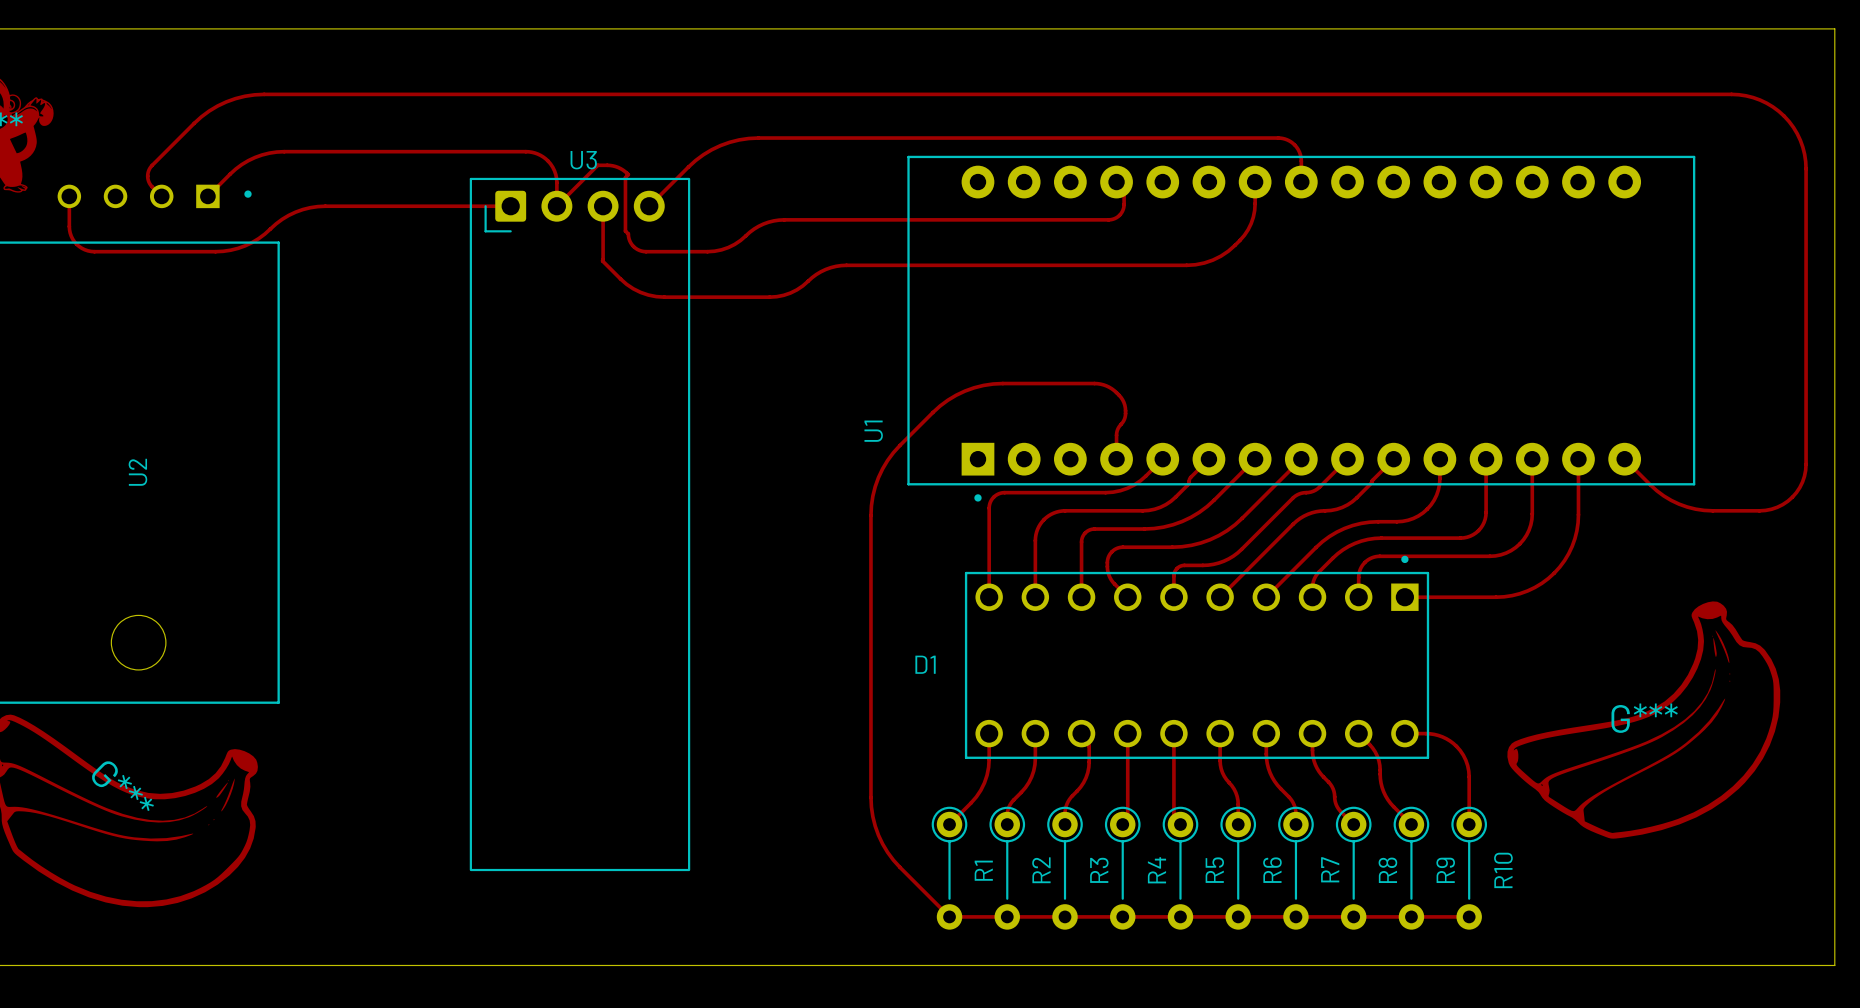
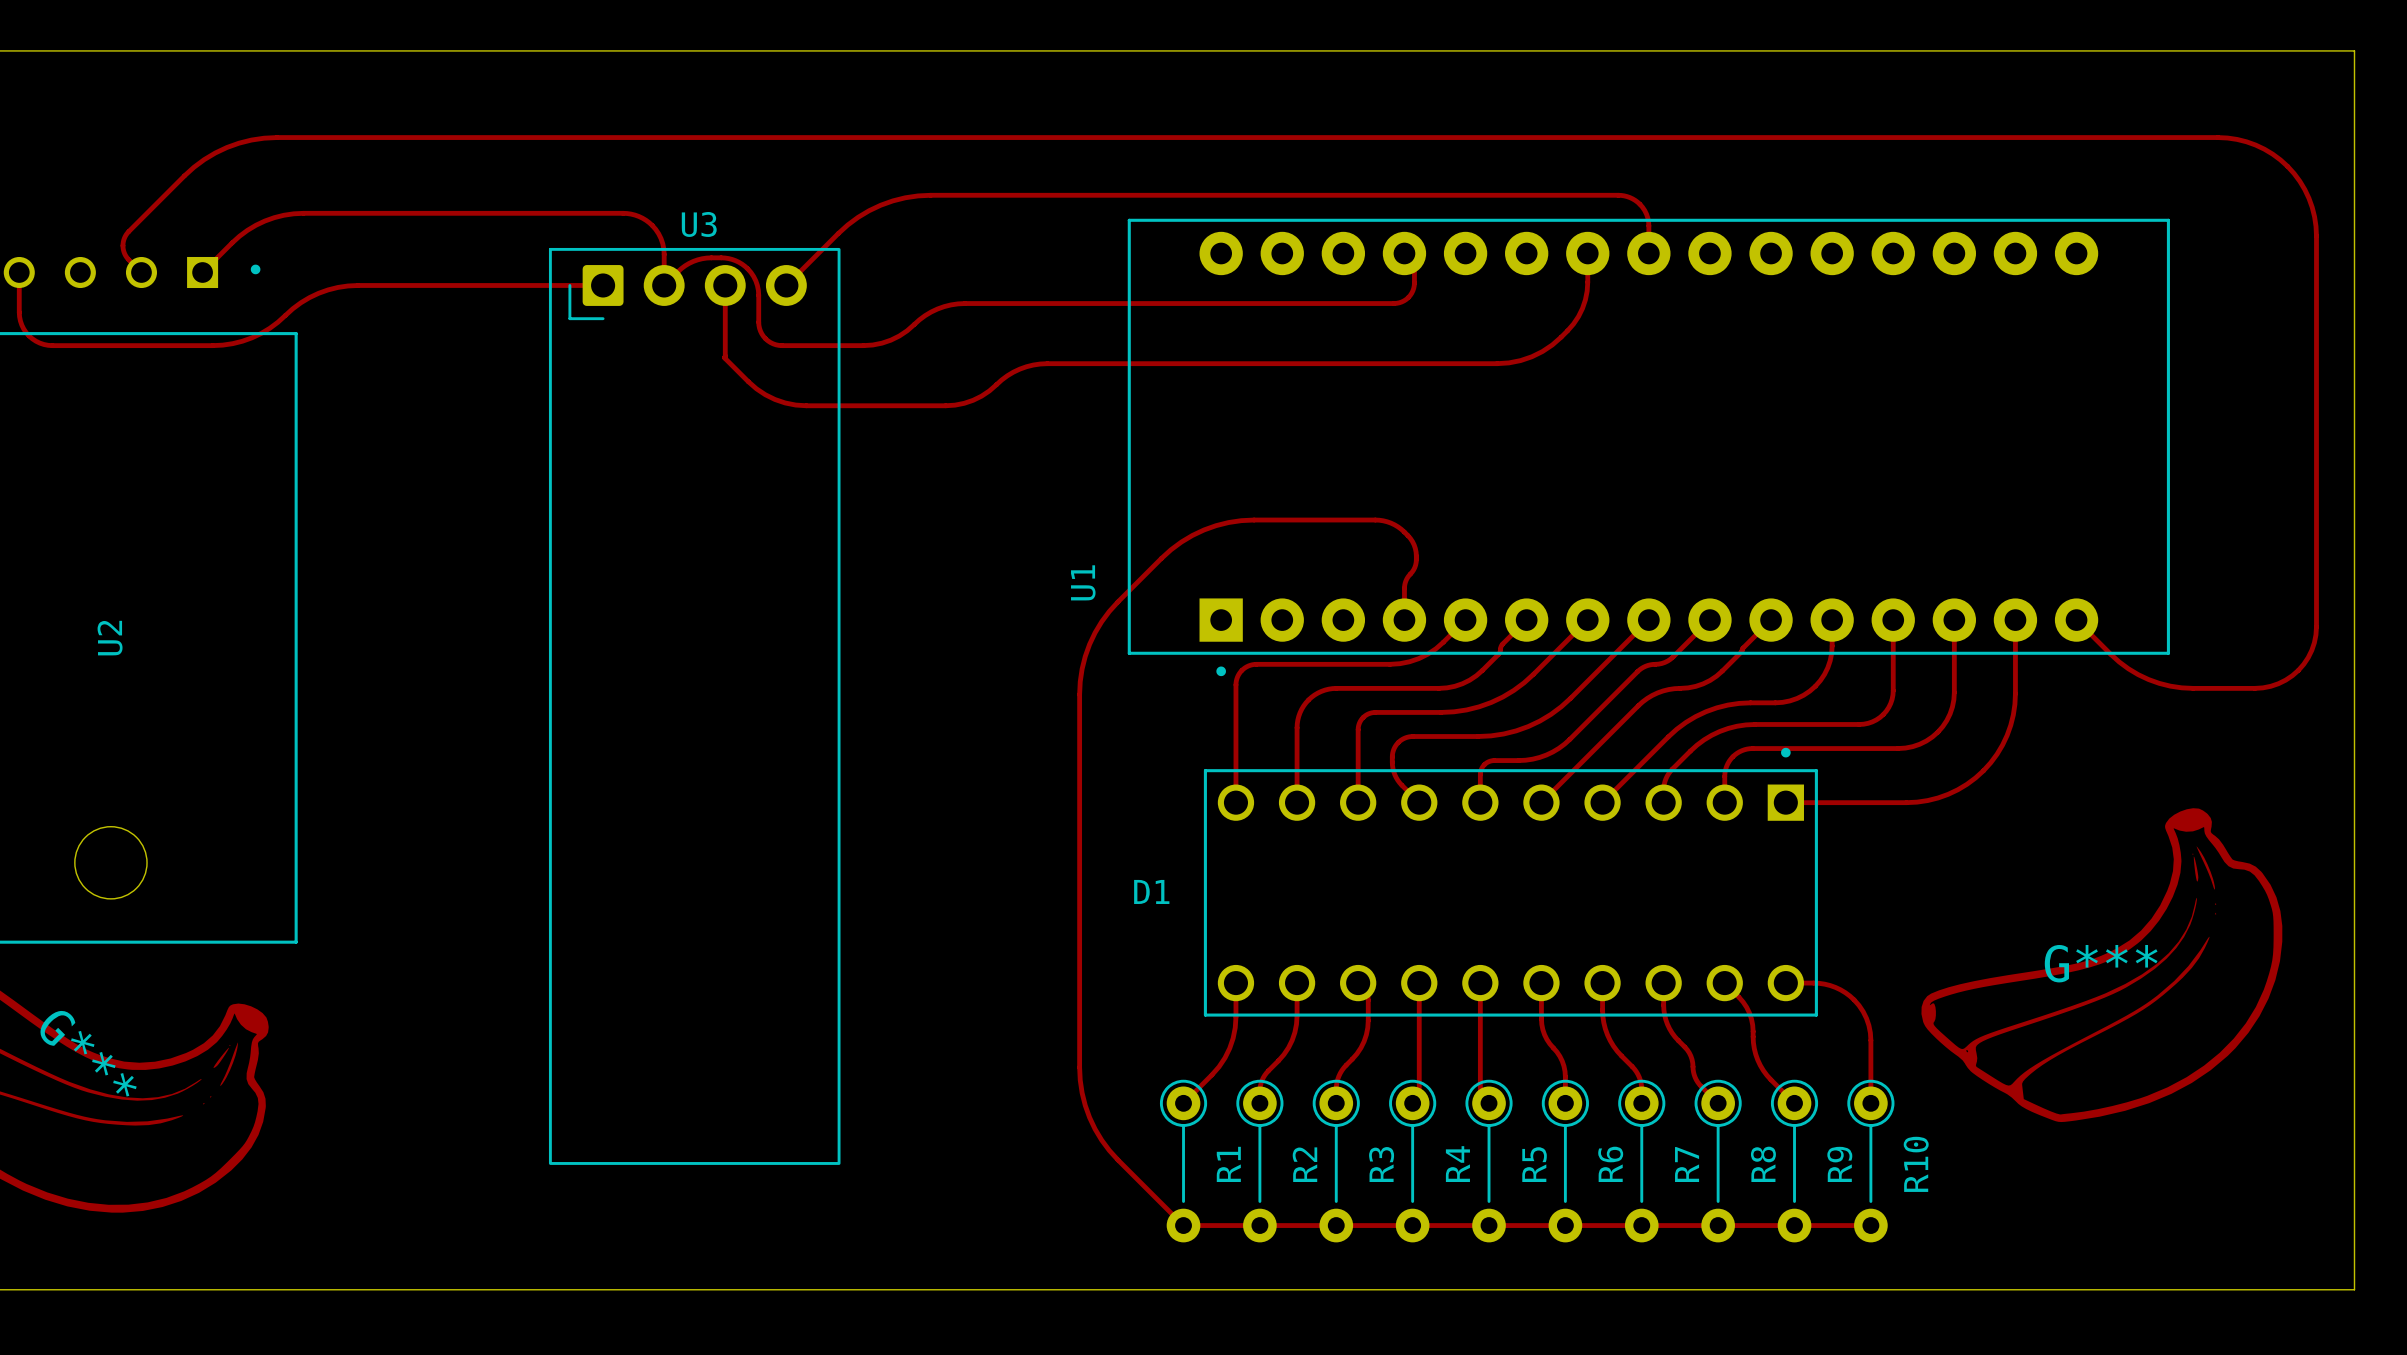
track: (626, 173) (628, 174) (625, 177) (625, 231) (628, 233) -> none
track: (627, 173) (615, 166) (597, 165) (567, 195) -> (758, 322) (757, 285) (750, 272) (742, 264) (728, 258) (706, 258) (693, 261) (678, 271)

